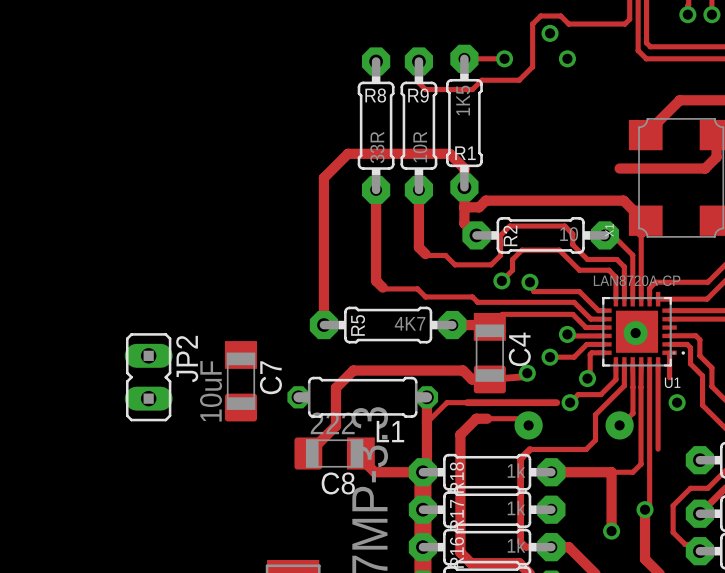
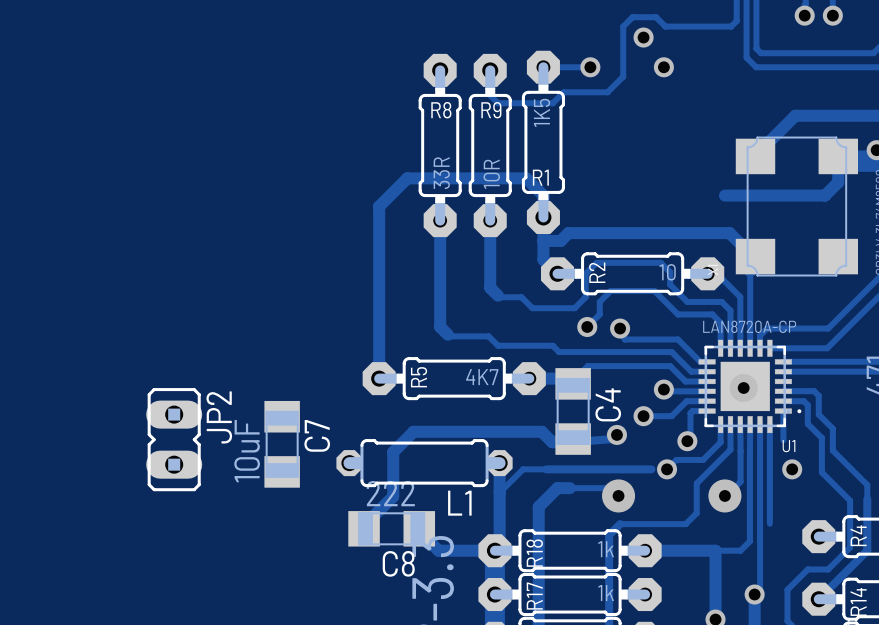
C4 footprint: [473, 312, 506, 394] -> [555, 368, 591, 455]
C7 footprint: [224, 341, 258, 422] -> [264, 400, 300, 488]
C8 footprint: [294, 437, 375, 470] -> [348, 511, 436, 547]

